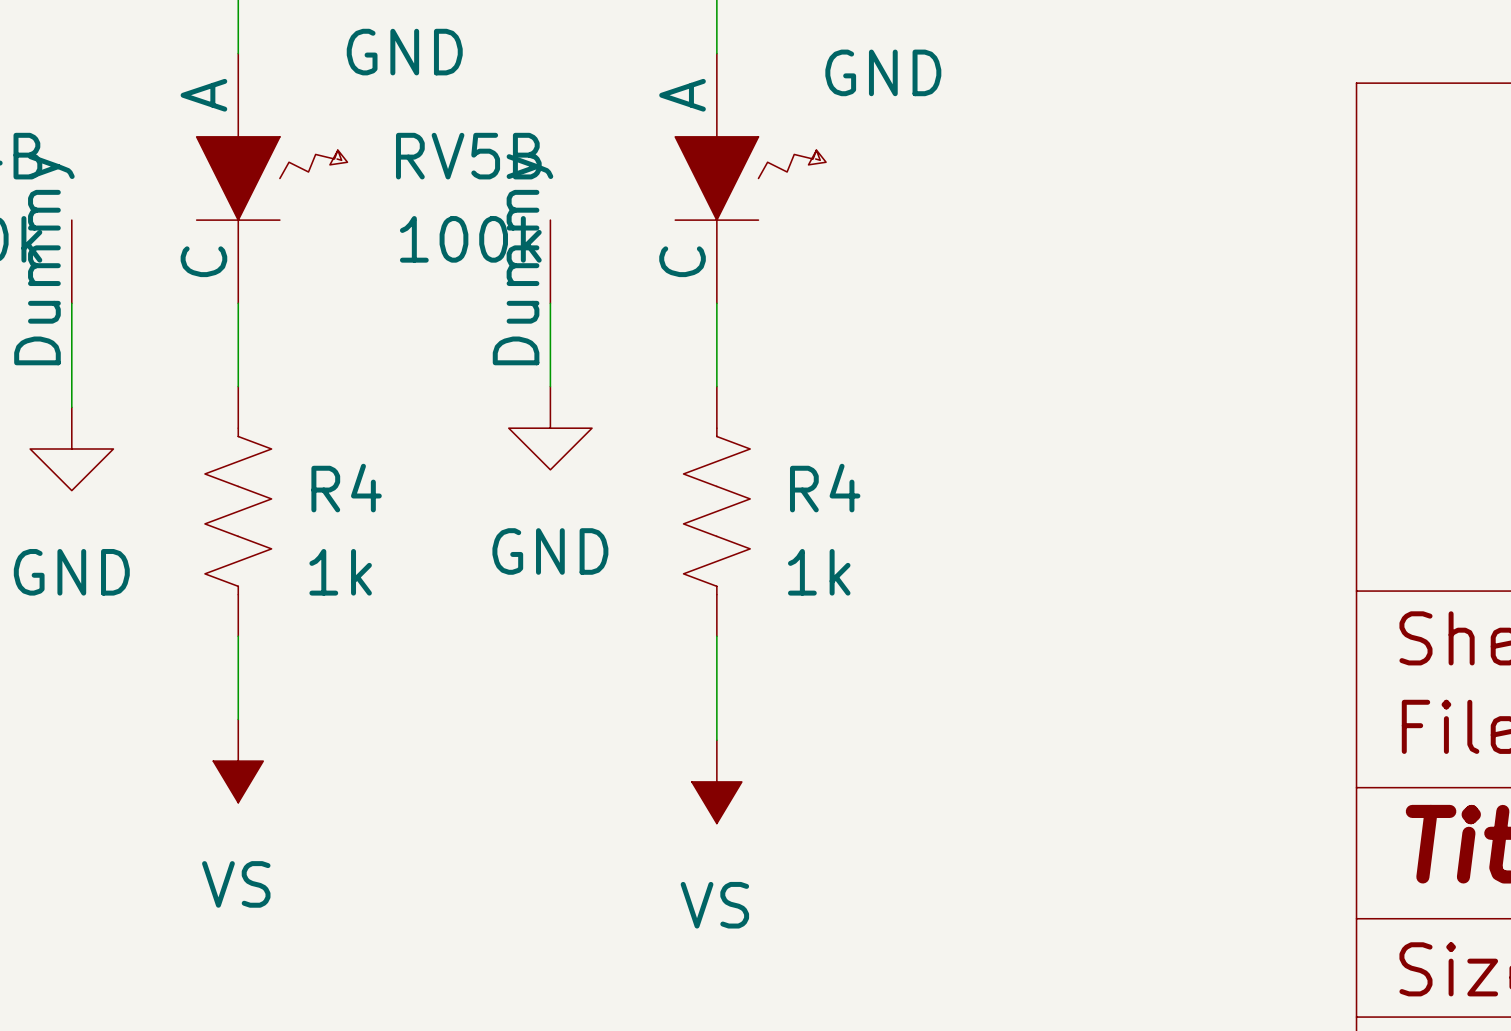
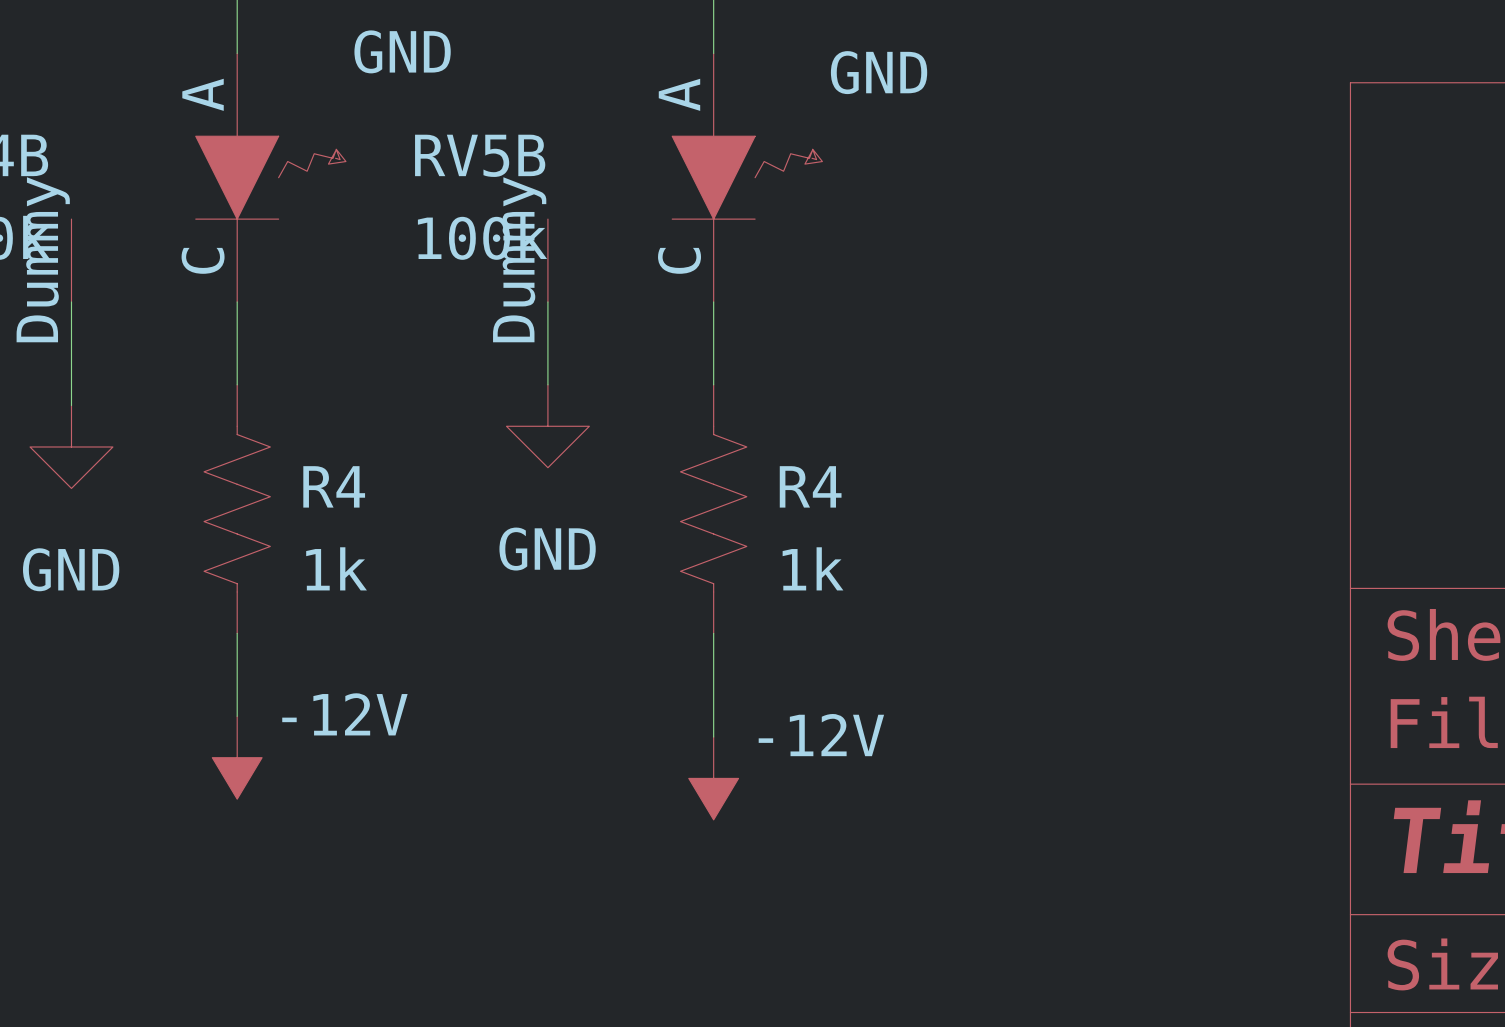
power symbol: VS (238, 761) -> -12V (237, 757)
power symbol: VS (716, 781) -> -12V (713, 778)

